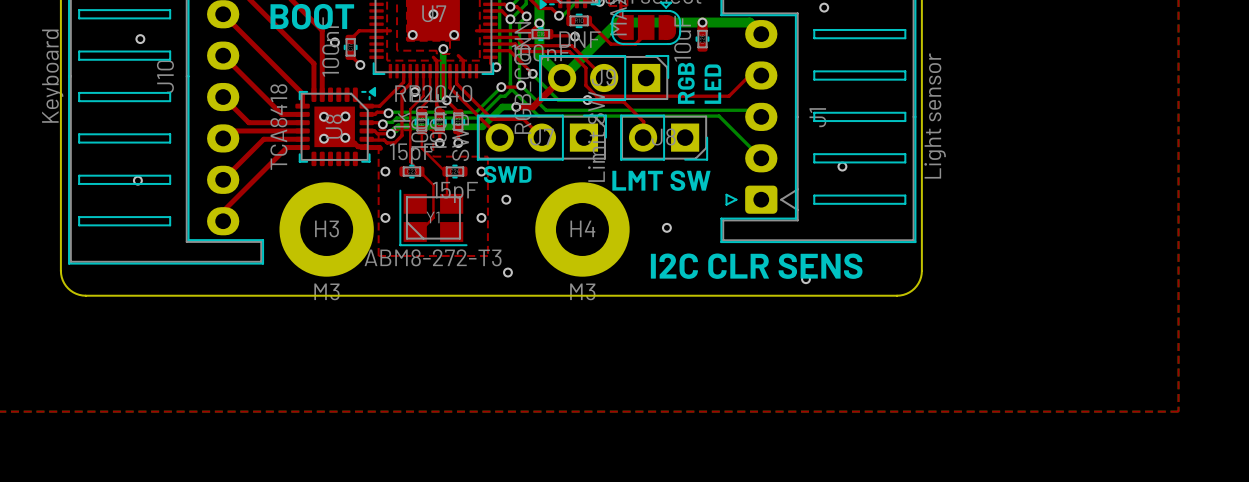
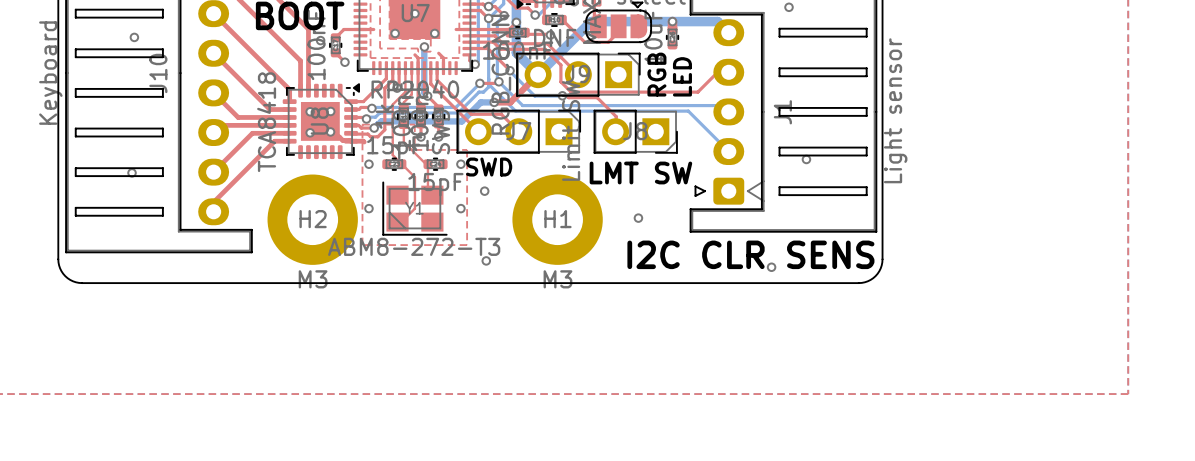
H3 name: H3 (327, 228) -> H2 (313, 219)
H4 name: H4 (582, 228) -> H1 (557, 219)

